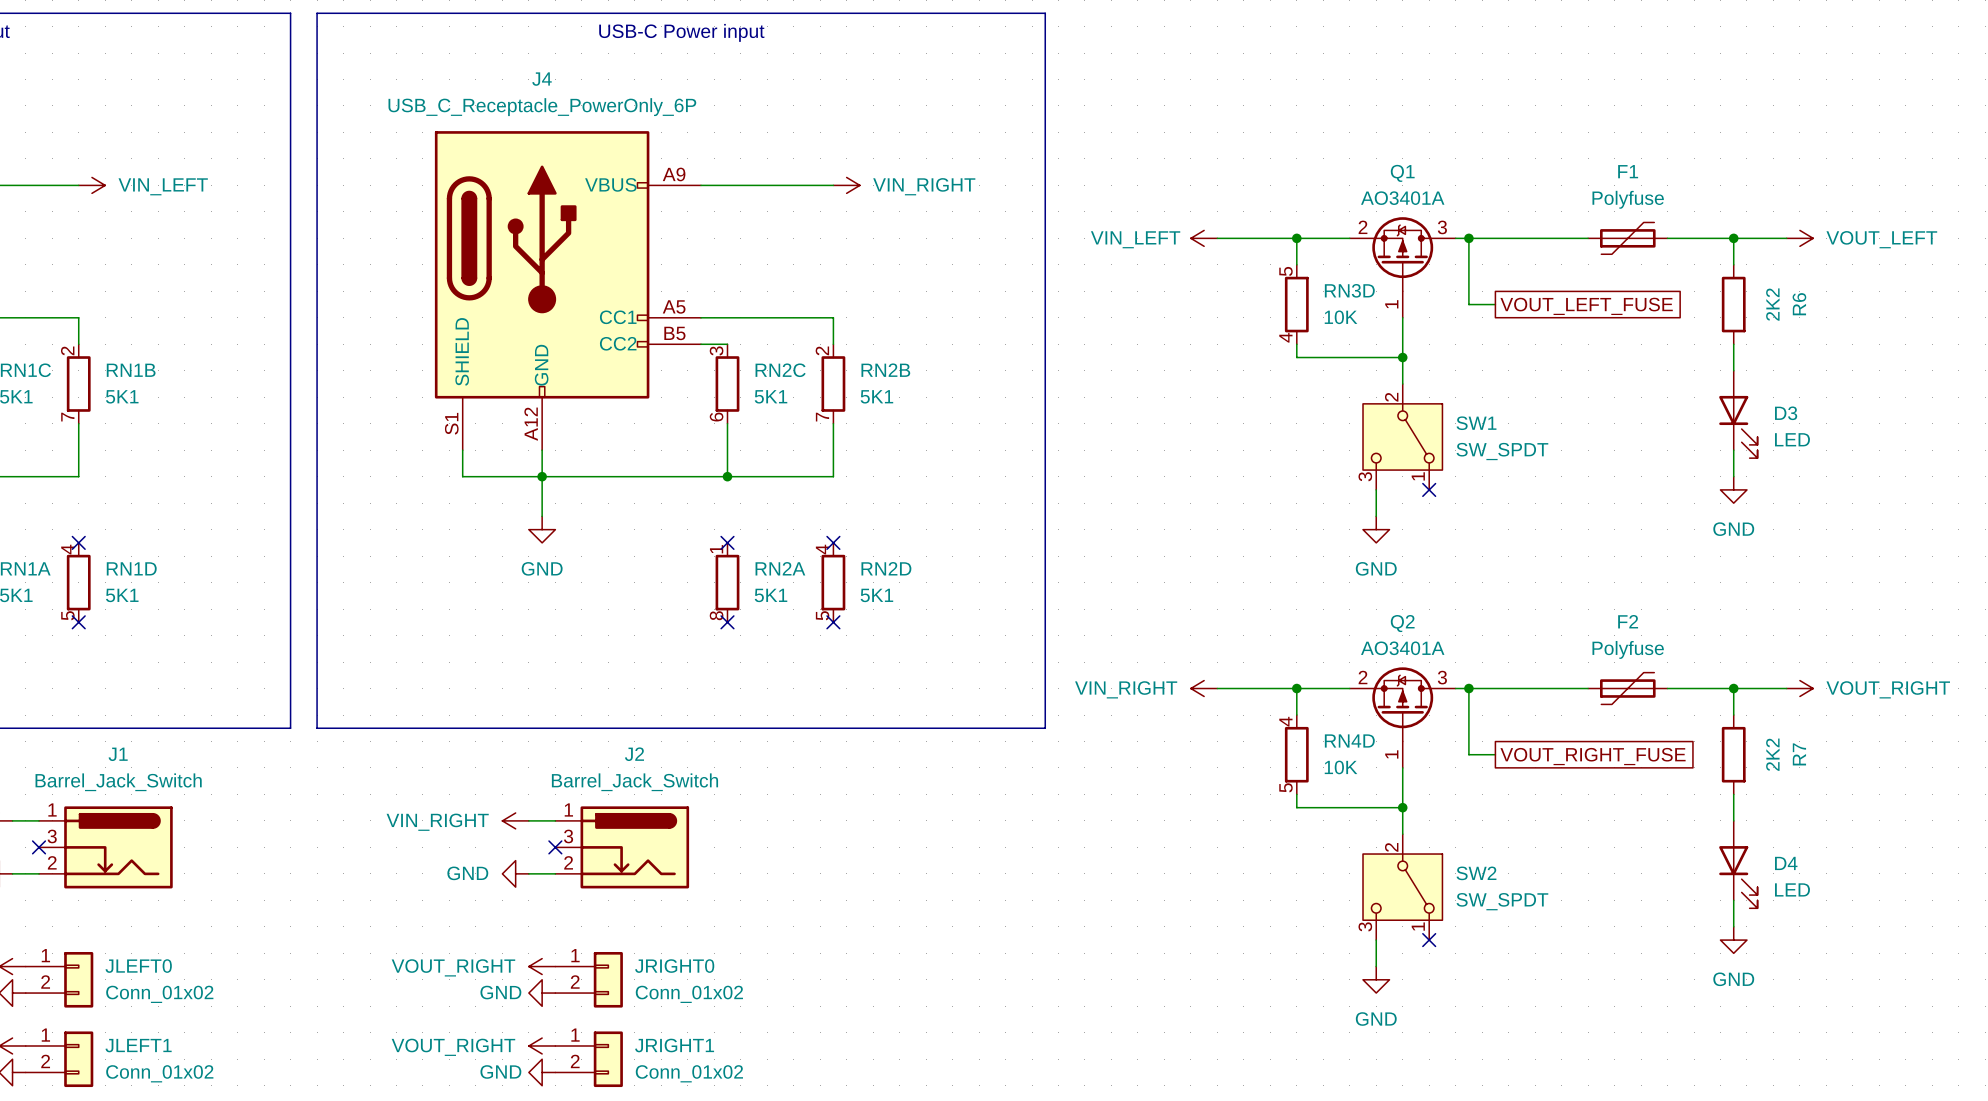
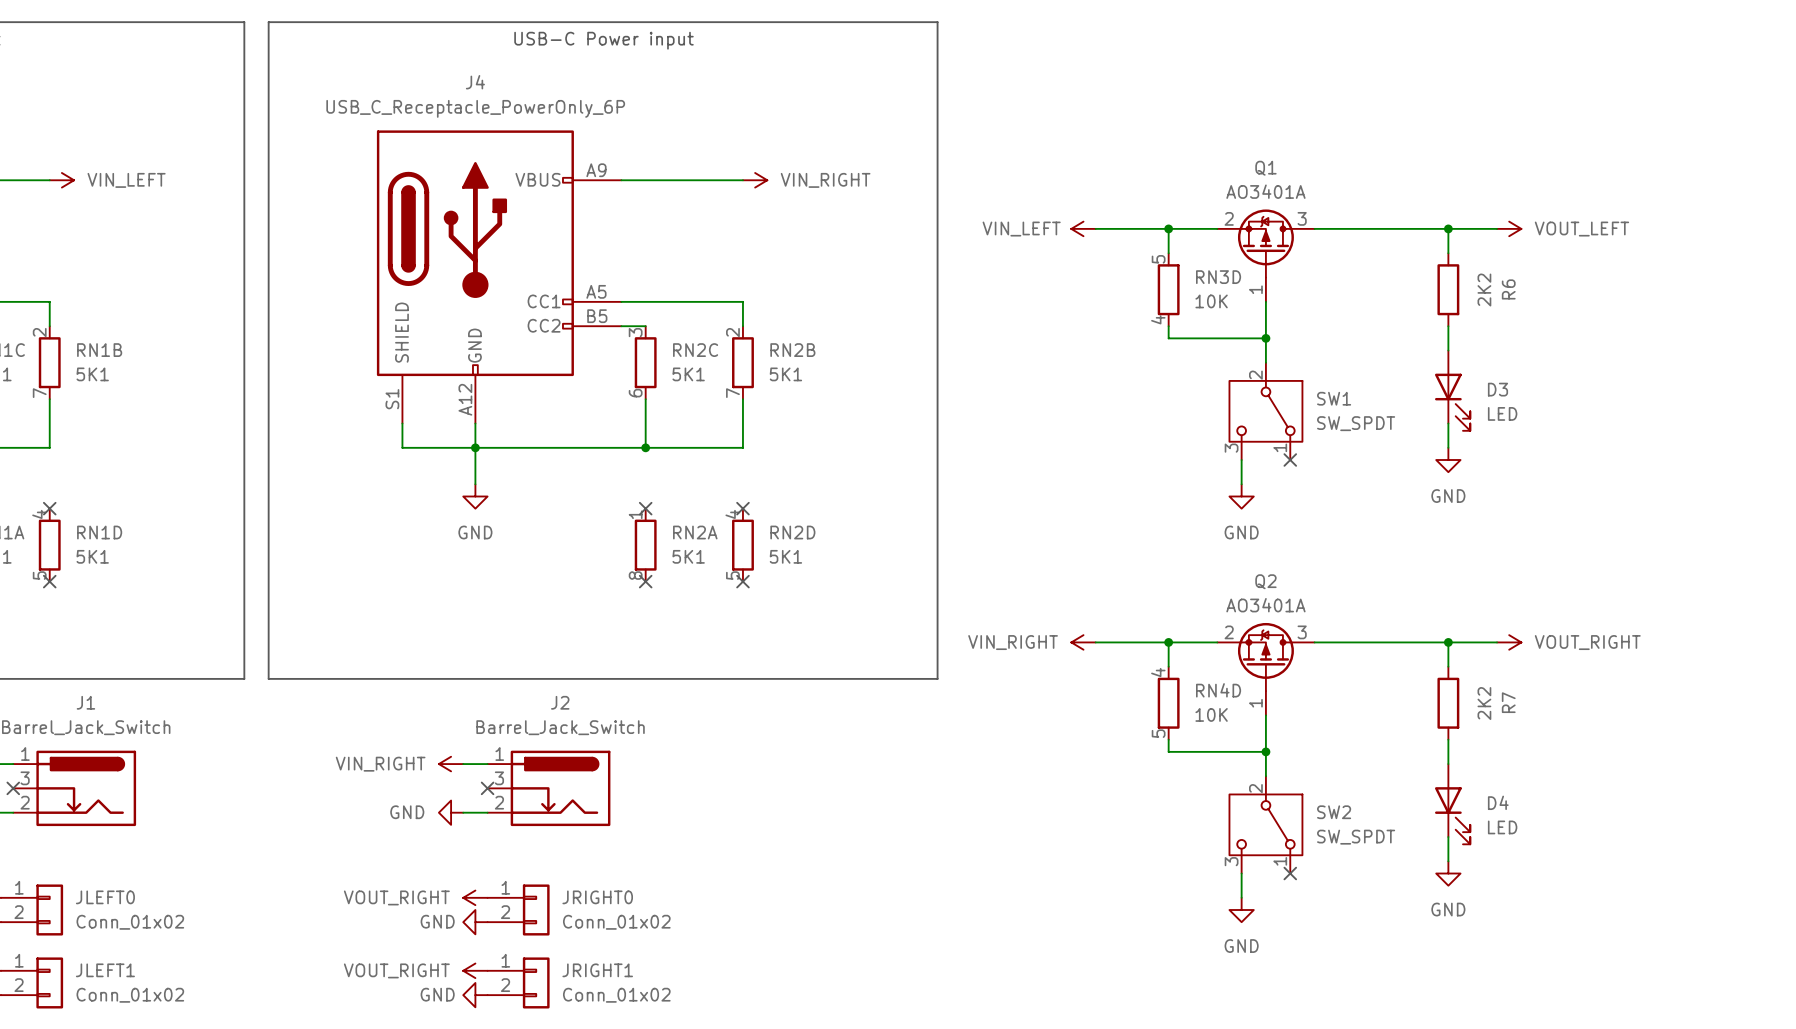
wire: (1468, 238) (1468, 304) (1495, 304) -> none
junction: (1468, 238) -> none
junction: none -> (1448, 228)
F1: Polyfuse (1627, 238) -> none
wire: (1667, 238) (1786, 238) -> none
wire: (1733, 238) (1733, 264) -> (1448, 228) (1448, 253)
junction: (1733, 238) -> none
power symbol position: VOUT_LEFT (1799, 238) -> VOUT_LEFT (1509, 228)
R6 position: (1733, 304) -> (1448, 289)
global label: VOUT_LEFT_FUSE (1586, 306) -> none
wire: (1733, 344) (1733, 370) -> (1448, 326) (1448, 350)
D3 position: (1738, 414) -> (1452, 390)
wire: (1733, 450) (1733, 476) -> (1448, 423) (1448, 447)
power symbol position: GND (1733, 489) -> GND (1448, 460)
wire: (1468, 688) (1468, 754) (1495, 754) -> none
junction: (1468, 688) -> none
junction: none -> (1448, 642)
F2: Polyfuse (1627, 688) -> none
wire: (1667, 688) (1786, 688) -> none
wire: (1733, 688) (1733, 715) -> (1448, 642) (1448, 666)
junction: (1733, 688) -> none
power symbol position: VOUT_RIGHT (1799, 688) -> VOUT_RIGHT (1509, 642)
R7 position: (1733, 754) -> (1448, 703)
global label: VOUT_RIGHT_FUSE (1593, 756) -> none
wire: (1733, 794) (1733, 820) -> (1448, 739) (1448, 764)
D4 position: (1738, 864) -> (1452, 804)
wire: (1733, 900) (1733, 926) -> (1448, 837) (1448, 861)
power symbol position: GND (1733, 940) -> GND (1448, 873)

